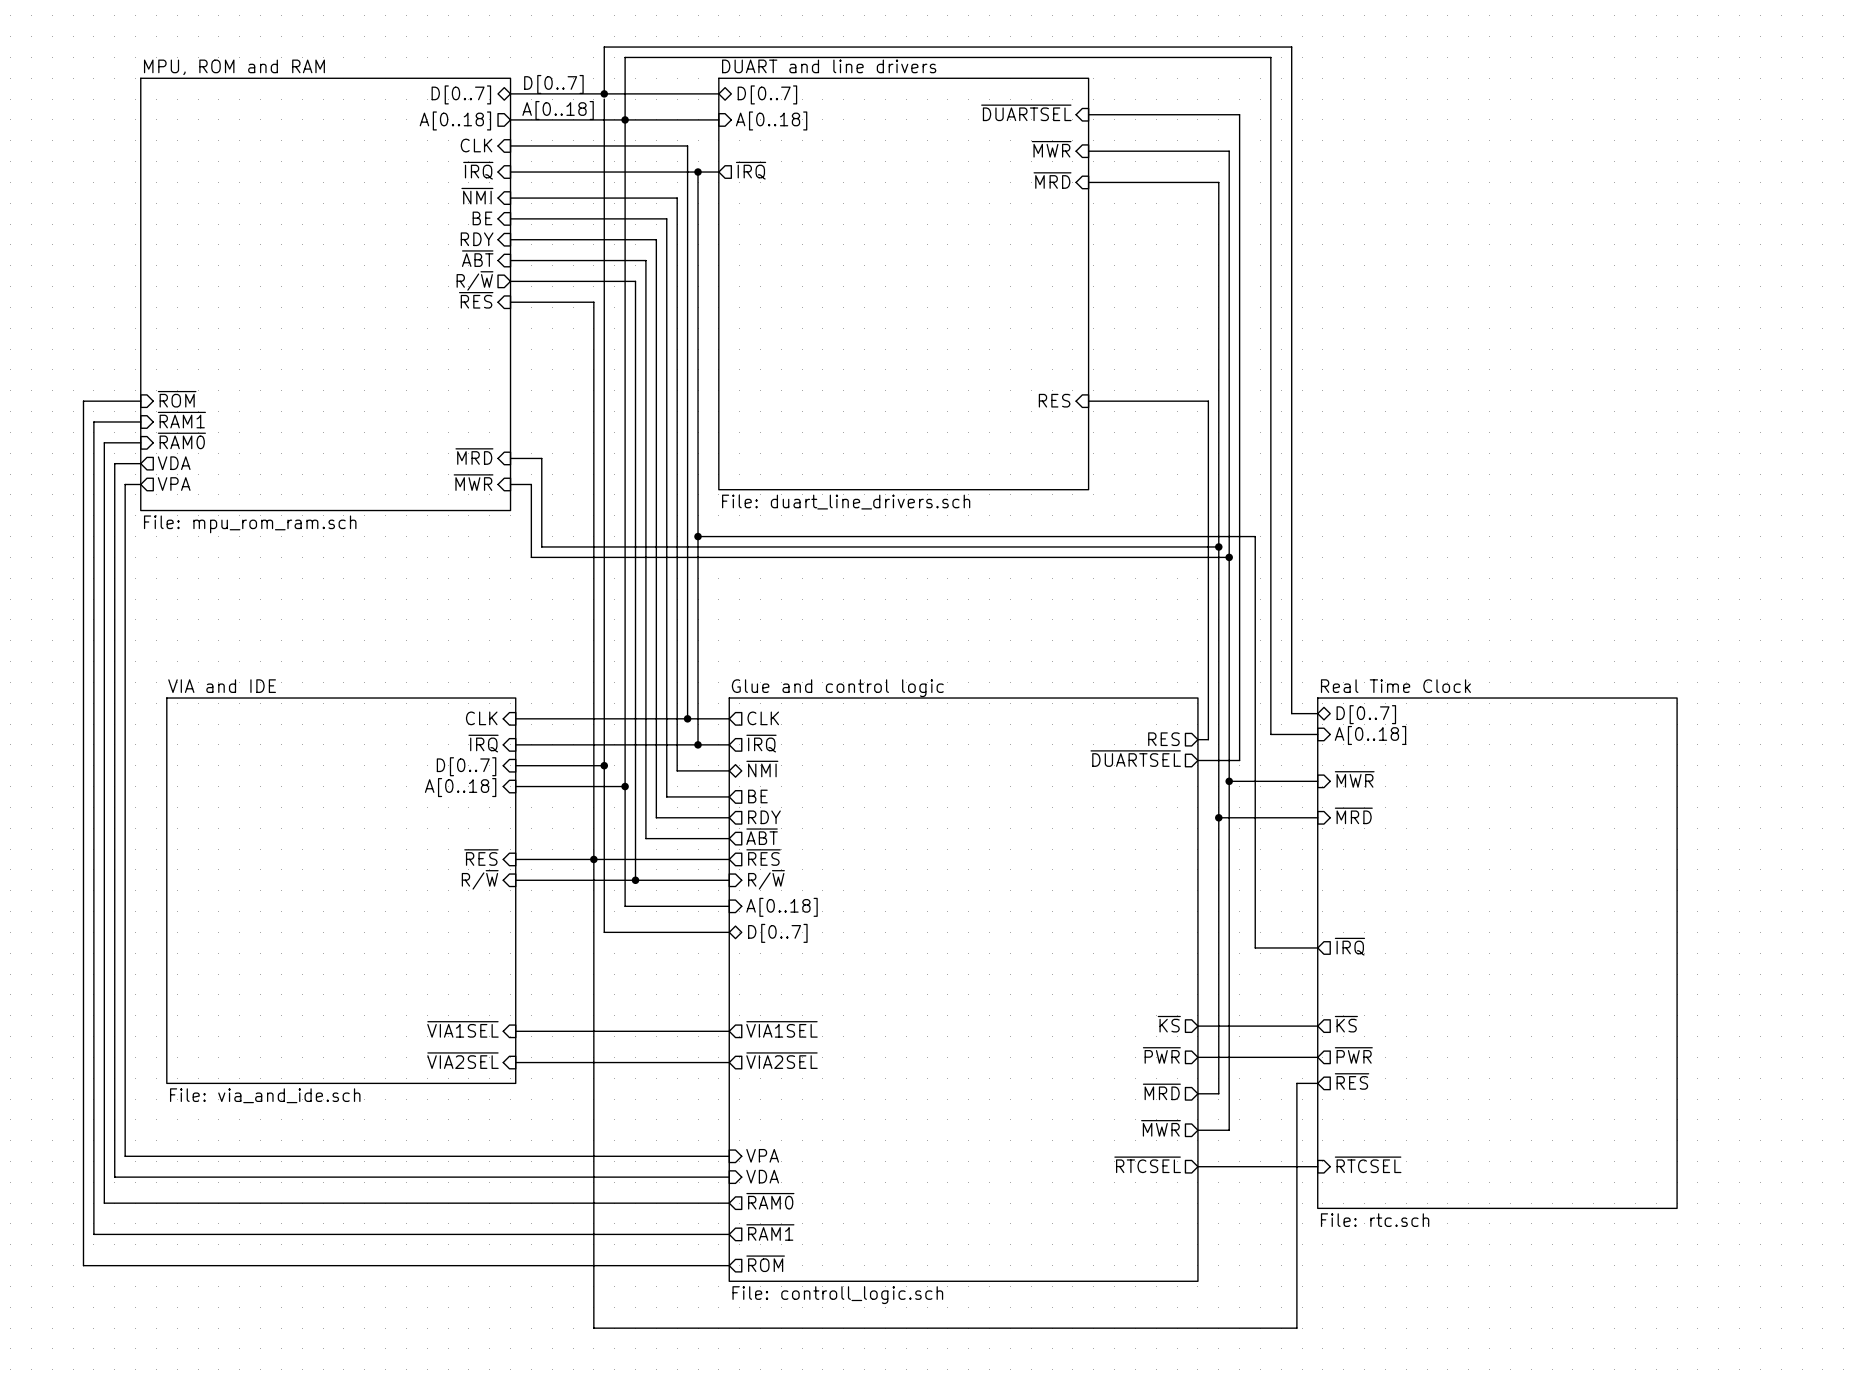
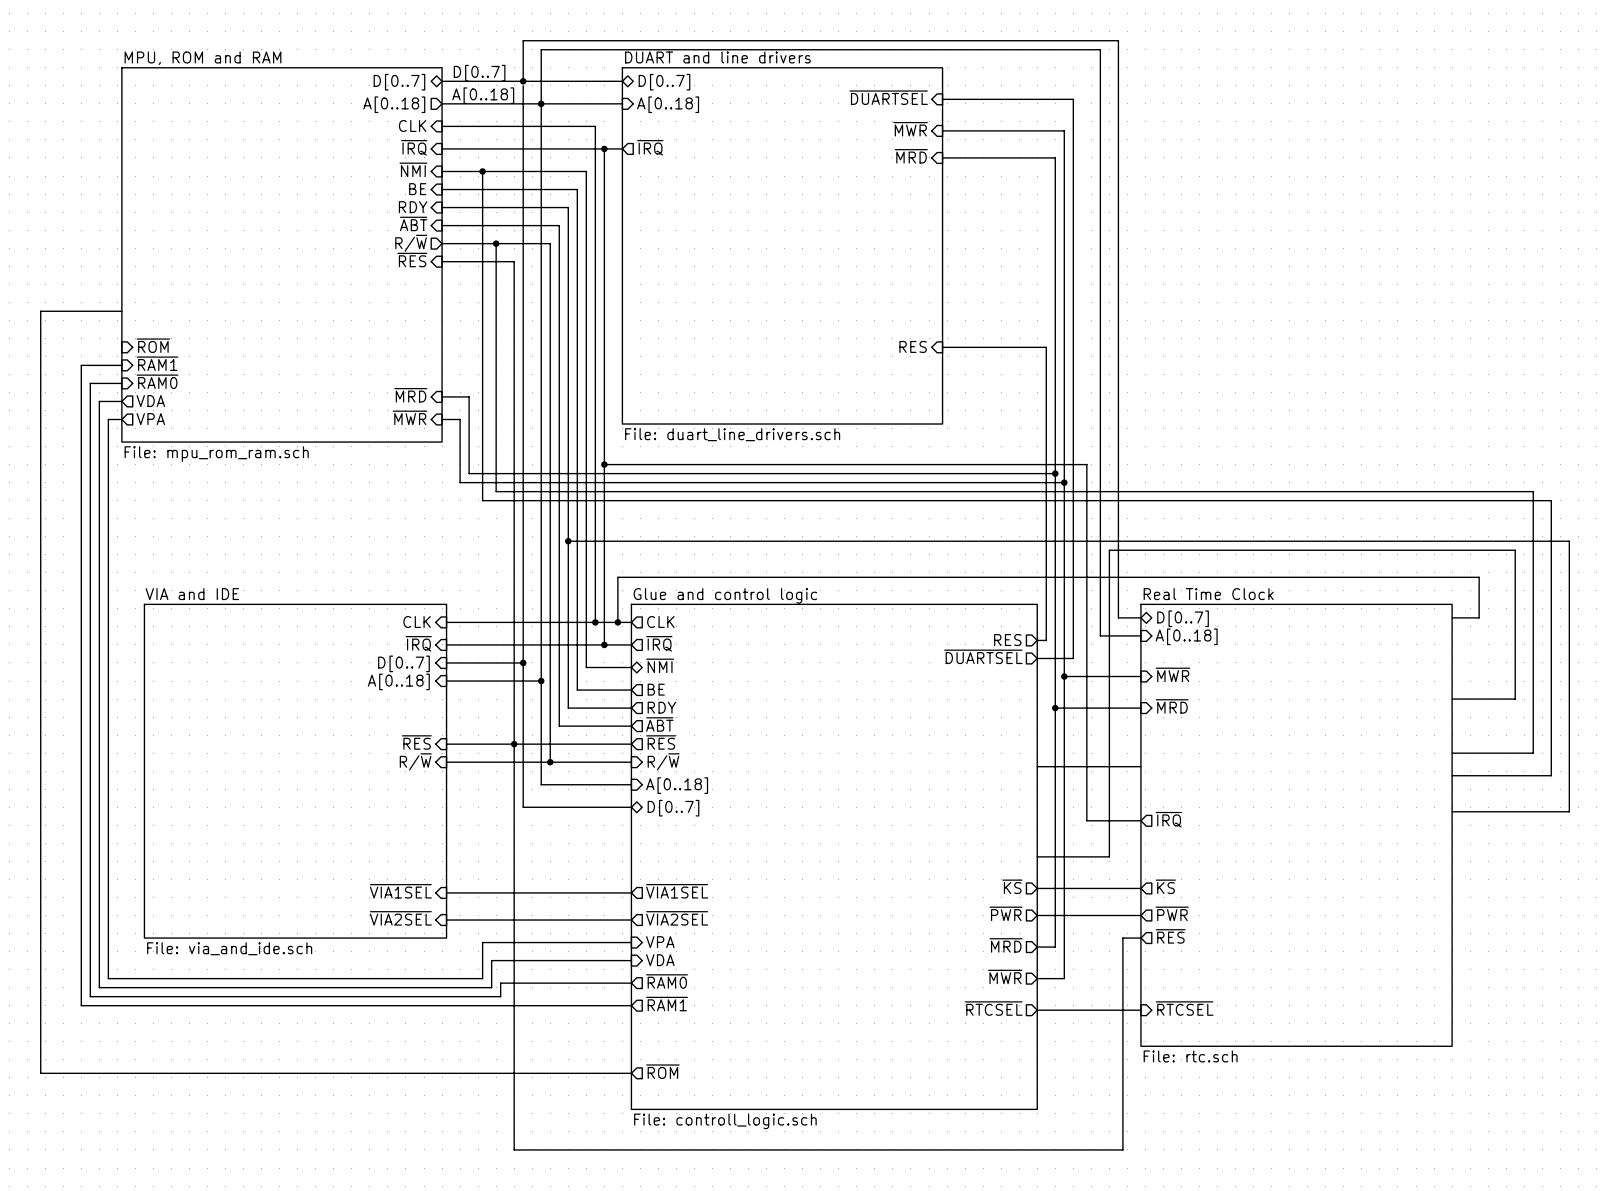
wire: none -> (482, 171) (482, 500) (1551, 500) (1551, 775) (1452, 775)
junction: none -> (482, 171)
wire: none -> (496, 243) (496, 491) (1533, 491) (1533, 753) (1452, 753)
junction: none -> (496, 243)
wire: none -> (121, 311) (40, 311) (40, 1073) (631, 1073)
wire: (140, 401) (83, 401) (83, 1265) (729, 1265) -> none
wire: none -> (568, 541) (1569, 541) (1569, 811) (1452, 811)
junction: none -> (568, 541)
wire: none -> (1452, 617) (1479, 617) (1479, 577) (617, 577) (617, 622)
junction: none -> (617, 622)
wire: none -> (1452, 699) (1515, 699) (1515, 550) (1109, 550) (1109, 856) (1037, 856)
wire: none -> (1037, 766) (1140, 766)
wire: (125, 1130) (125, 1156) (729, 1156) -> (108, 978) (482, 978) (482, 942) (631, 942)
wire: (114, 1140) (114, 1177) (729, 1177) -> (99, 987) (491, 987) (491, 960) (631, 960)
wire: (104, 1151) (104, 1203) (729, 1203) -> (90, 996) (500, 996) (500, 983) (631, 983)
sheet pin position: VPA (762, 1155) -> VPA (660, 942)
wire: (93, 1161) (93, 1234) (729, 1234) -> (81, 1005) (631, 1005)
sheet pin position: VDA (762, 1176) -> VDA (660, 960)
sheet pin position: ~{RAM0} (770, 1201) -> ~{RAM0} (667, 981)
sheet pin position: ~{RAM1} (770, 1232) -> ~{RAM1} (667, 1004)
sheet pin position: ~{ROM} (765, 1263) -> ~{ROM} (662, 1071)

